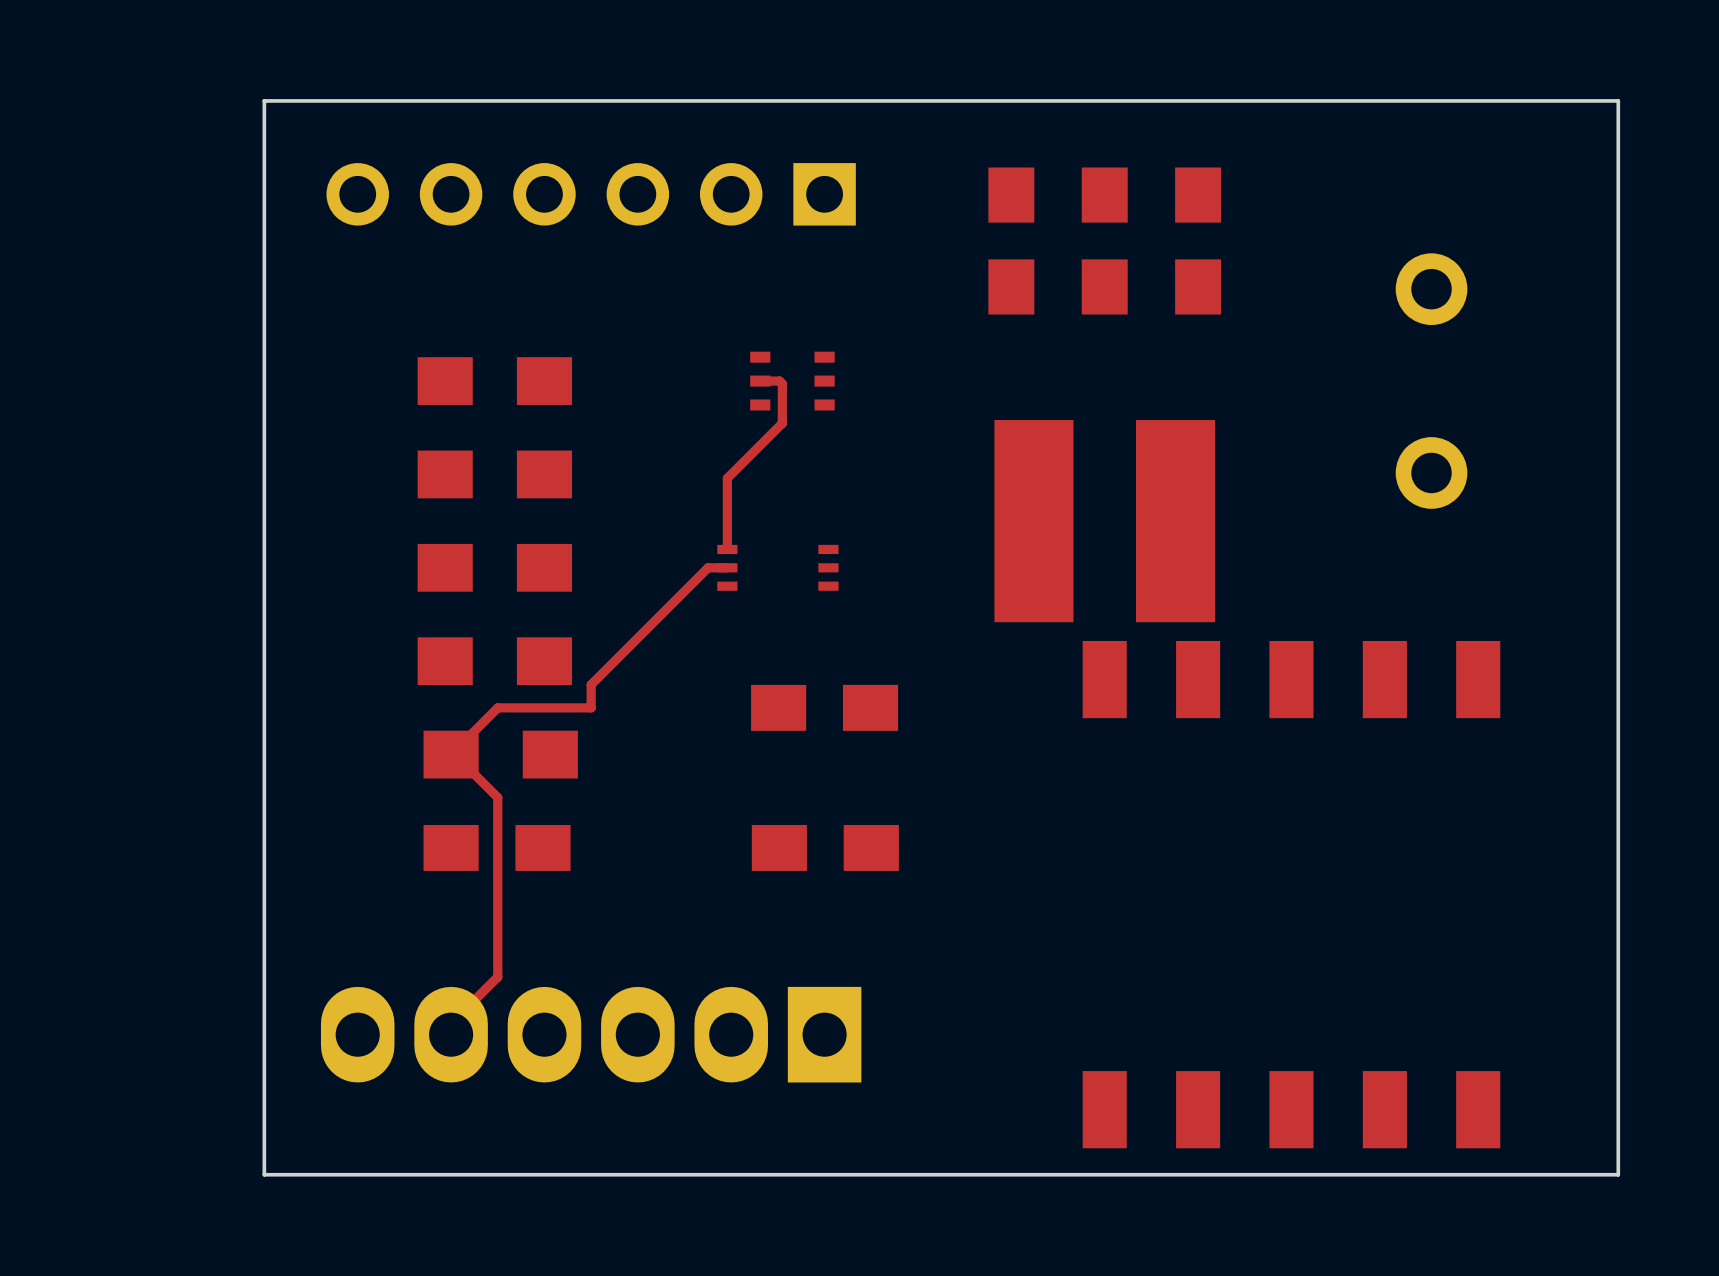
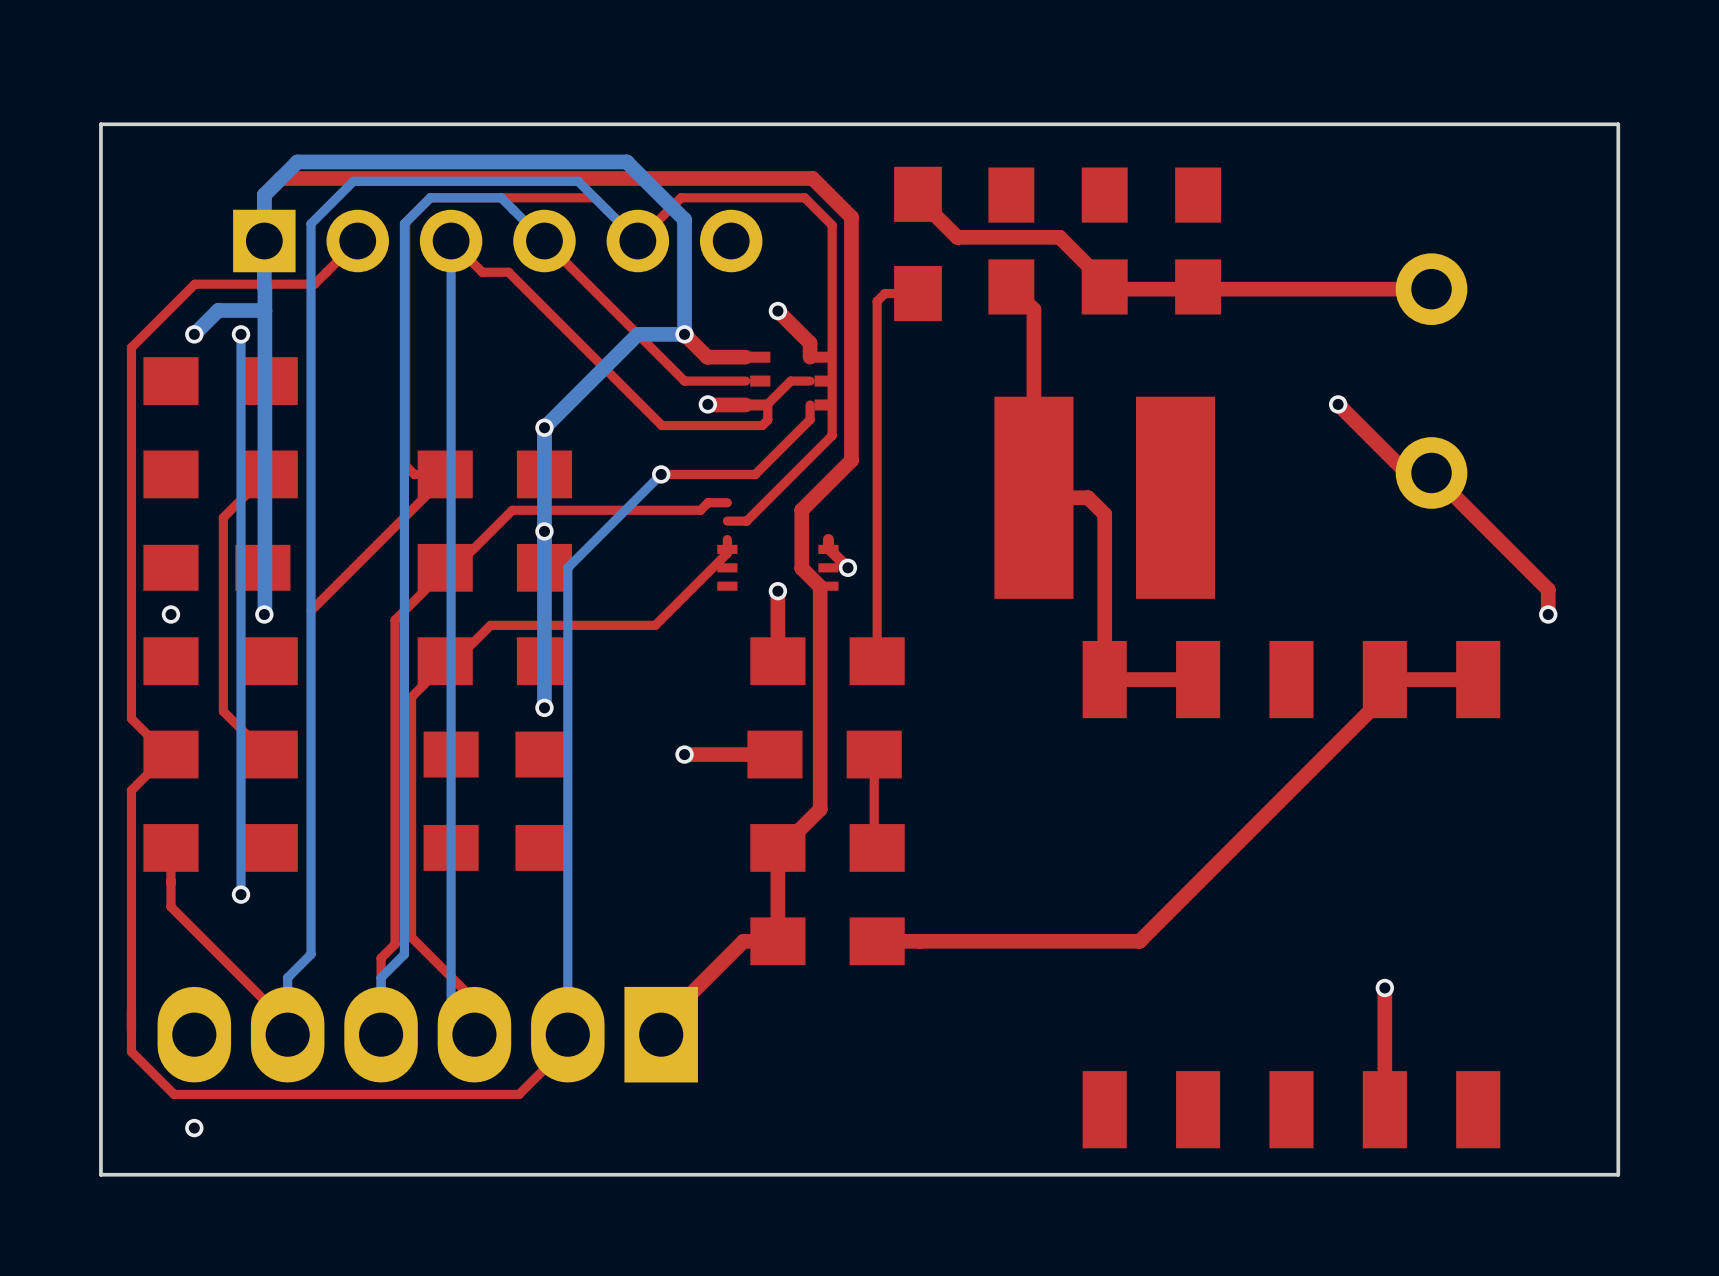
board edge: (1618, 124) (1618, 100) (264, 100) (264, 1174) -> (1618, 124) (100, 124) (100, 1174) (264, 1174)
part rotation: 0° (591, 194) -> 180° (497, 241)
top track: none -> (917, 194) (917, 197) (957, 237) (1059, 237) (1104, 282) (1106, 289) (1431, 289)
top track: none -> (264, 241) (264, 195) (280, 178) (812, 178) (851, 217) (851, 460) (801, 510) (801, 568) (820, 586) (820, 809) (781, 847) (777, 847) (777, 941) (743, 941) (661, 1023) (661, 1034)
top track: none -> (357, 241) (314, 284) (194, 284) (131, 347) (131, 718) (167, 754)
top track: none -> (451, 241) (482, 272) (508, 272) (661, 425) (762, 425) (767, 420) (767, 404) (790, 381) (810, 381)
bottom track: none -> (451, 241) (451, 1011) (474, 1034)
top track: none -> (544, 241) (684, 381) (745, 381)
bottom track: none -> (544, 241) (501, 197) (430, 197) (404, 223) (404, 954) (381, 977) (381, 1034)
bottom track: none -> (637, 241) (578, 181) (353, 181) (311, 223) (311, 954) (287, 977) (287, 1034)
part: none -> (917, 243)
top track: none -> (1011, 286) (1033, 309) (1033, 497) (1088, 497) (1104, 514) (1104, 679) (1198, 679)
top track: none -> (917, 293) (884, 293) (877, 301) (877, 661)
bottom track: none -> (264, 311) (218, 310) (194, 334)
top track: none -> (777, 311) (810, 343) (810, 357)
via: none -> (777, 311)
via: none -> (194, 334)
bottom track: none -> (241, 334) (241, 894)
via: none -> (241, 334)
top track: none -> (684, 334) (707, 357) (745, 357)
via: none -> (684, 334)
part: none -> (220, 381)
part: (494, 381) -> none
top track: (760, 381) (779, 381) (782, 383) (782, 423) (727, 478) (727, 539) -> none
top track: none -> (707, 404) (745, 404)
via: none -> (707, 404)
top track: none -> (810, 404) (810, 419) (755, 474) (661, 474)
top track: none -> (1338, 404) (1406, 472) (1431, 472) (1548, 589) (1548, 614)
via: none -> (1338, 404)
via: none -> (544, 427)
part: none -> (220, 474)
top track: none -> (270, 474) (266, 474) (223, 517) (223, 711) (266, 754) (270, 754)
top track: none -> (447, 474) (311, 610)
top track: none -> (451, 474) (414, 474) (405, 465) (405, 222) (430, 197) (594, 197) (637, 241) (681, 197) (804, 197) (832, 225) (832, 435) (746, 521) (727, 521)
bottom track: none -> (661, 474) (567, 567) (567, 1034)
via: none -> (661, 474)
top track: none -> (727, 502) (708, 502) (700, 510) (512, 510) (454, 567) (447, 567) (395, 620) (395, 944) (381, 958) (381, 1034)
part position: (1104, 521) -> (1104, 497)
via: none -> (544, 531)
top track: none -> (828, 539) (828, 548) (847, 567)
top track: none -> (727, 549) (727, 553) (655, 625) (490, 625) (454, 661) (447, 661) (411, 697) (411, 937) (474, 1000) (474, 1034)
top track: (727, 567) (708, 567) (591, 684) (591, 707) (497, 707) (451, 754) (454, 754) (497, 797) (497, 976) (451, 1023) (451, 1034) -> none
via: none -> (847, 567)
top track: none -> (777, 591) (777, 661)
via: none -> (777, 591)
via: none -> (170, 614)
bottom track: none -> (264, 614) (264, 195) (297, 161) (626, 161) (684, 219) (684, 334) (637, 334) (544, 427) (544, 707)
via: none -> (264, 614)
via: none -> (1548, 614)
part: none -> (220, 661)
part: none -> (827, 661)
top track: none -> (1478, 679) (1384, 679) (1384, 696) (1139, 941) (877, 941)
via: none -> (544, 707)
part position: (824, 707) -> (216, 567)
part footprint: [423, 730, 578, 779] -> [423, 731, 571, 778]
top track: none -> (167, 754) (131, 790) (131, 1051) (174, 1094) (519, 1094) (567, 1045) (567, 1034)
part: none -> (220, 754)
via: none -> (684, 754)
top track: none -> (774, 754) (684, 754)
part: none -> (824, 754)
top track: none -> (874, 754) (874, 845) (877, 847)
part footprint: [751, 824, 899, 871] -> [750, 824, 905, 872]
top track: none -> (170, 847) (170, 906) (287, 1023) (287, 1034)
part: none -> (220, 847)
via: none -> (241, 894)
part: none -> (827, 941)
top track: none -> (1384, 988) (1384, 1109)
via: none -> (1384, 988)
part position: (591, 1034) -> (427, 1034)
via: none -> (194, 1128)

